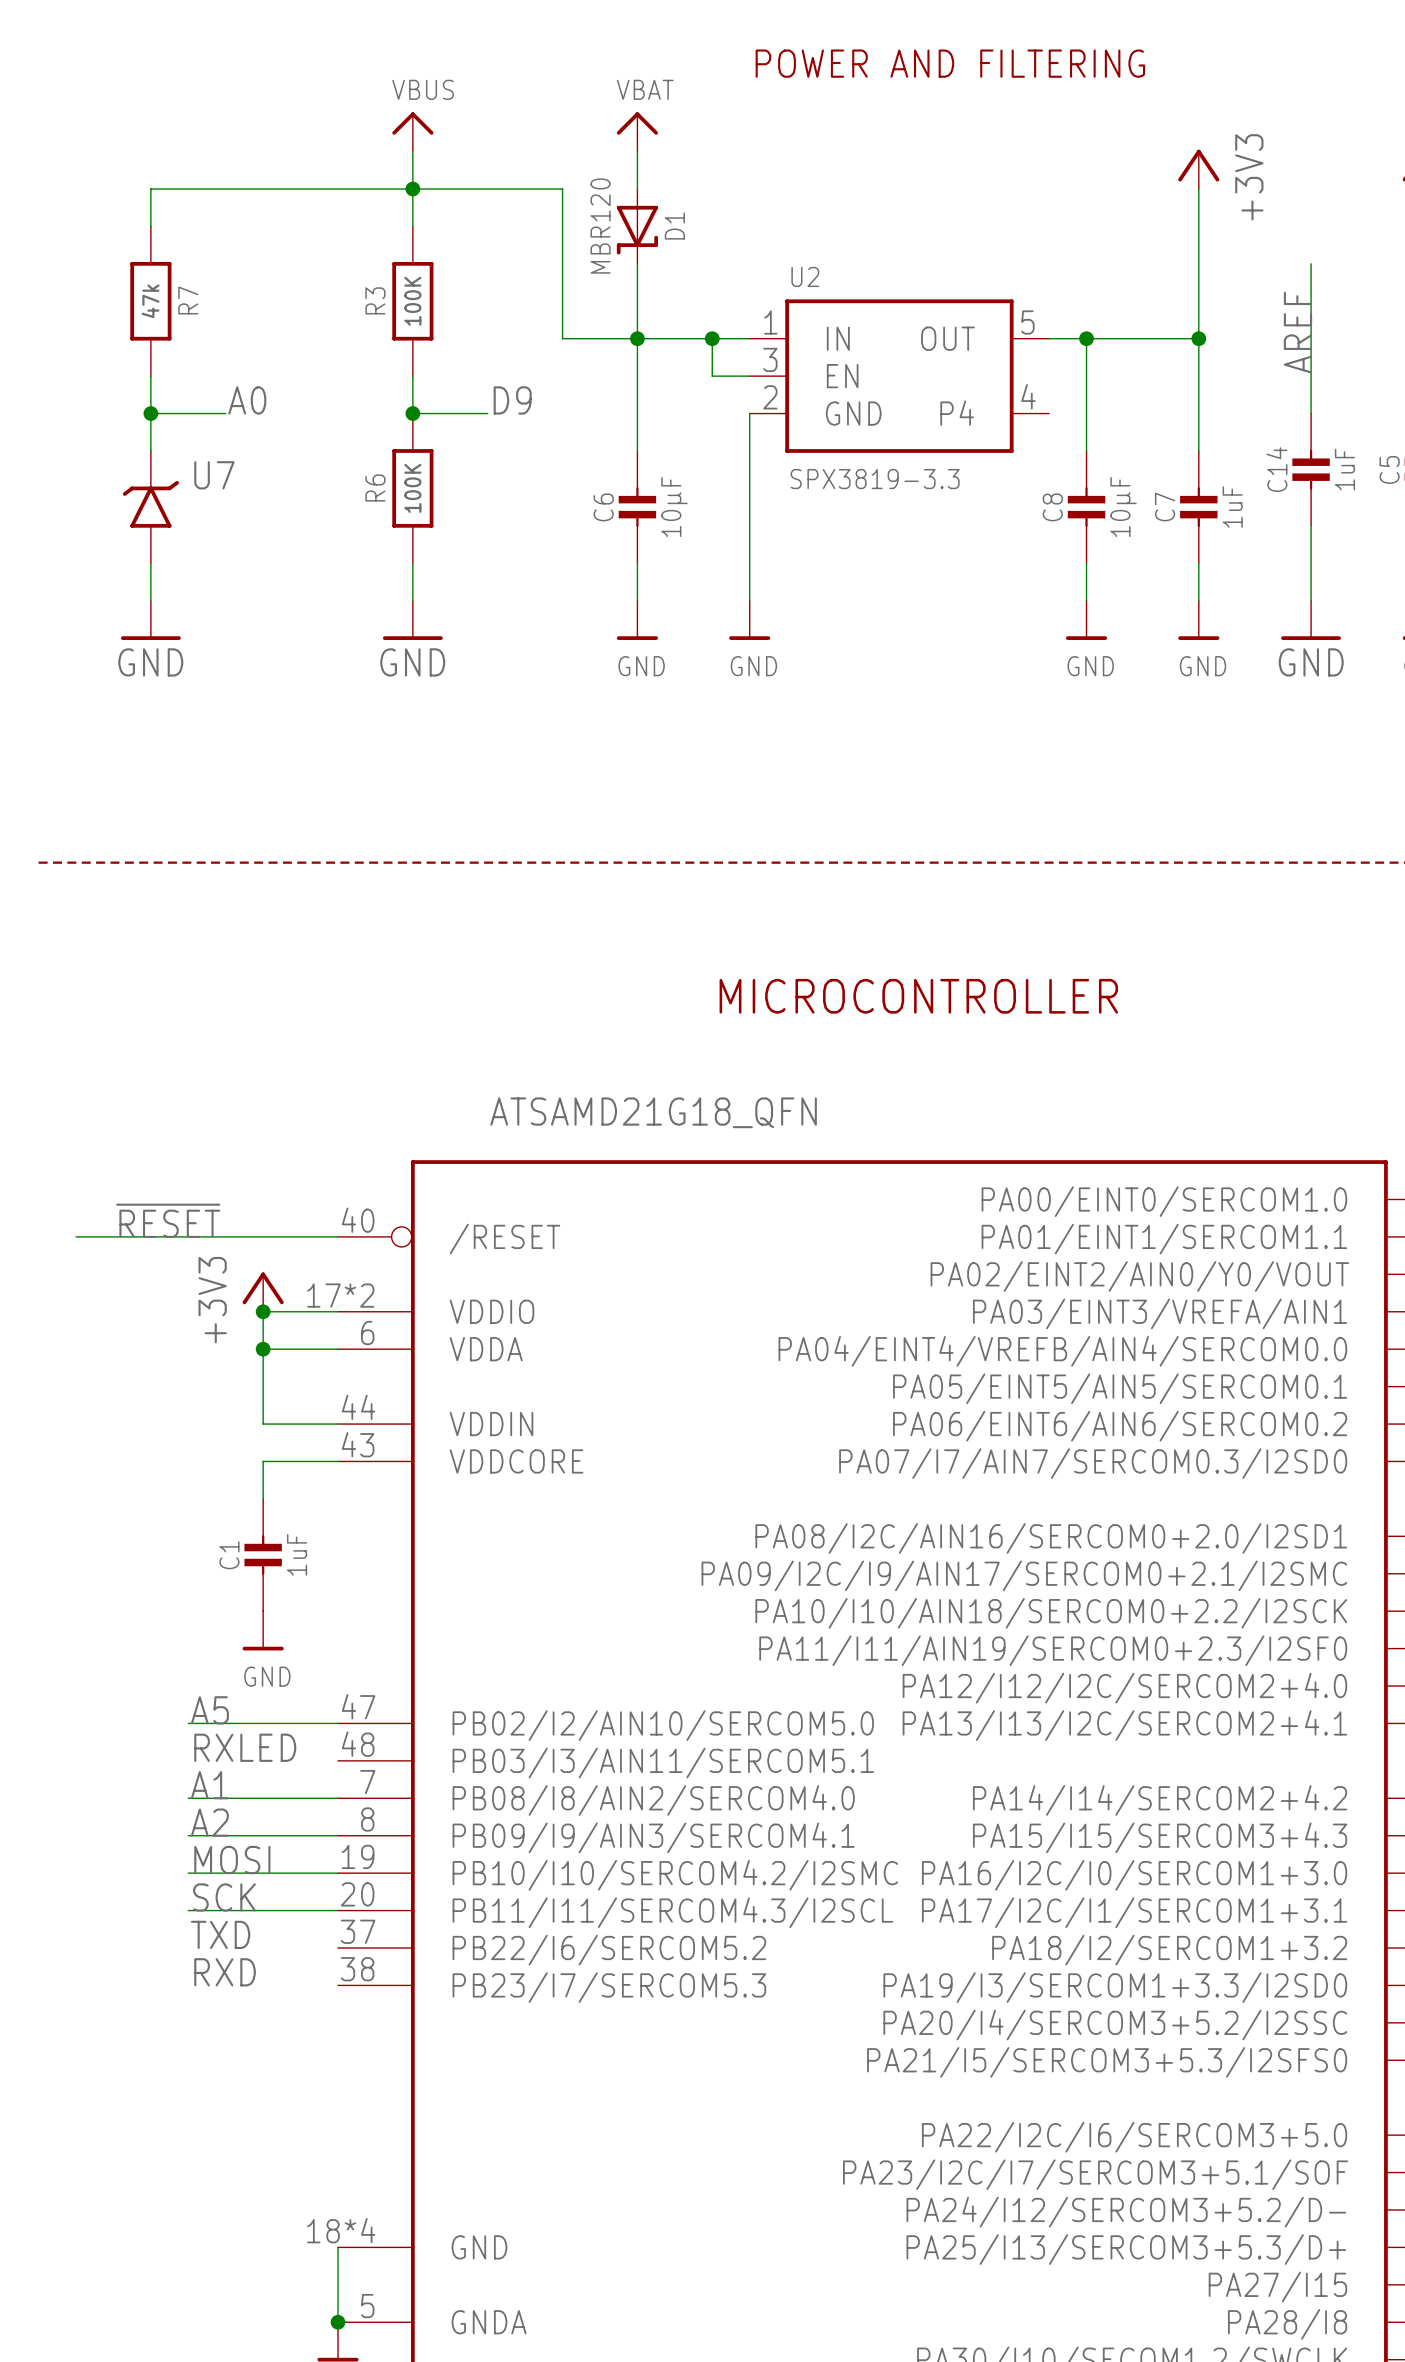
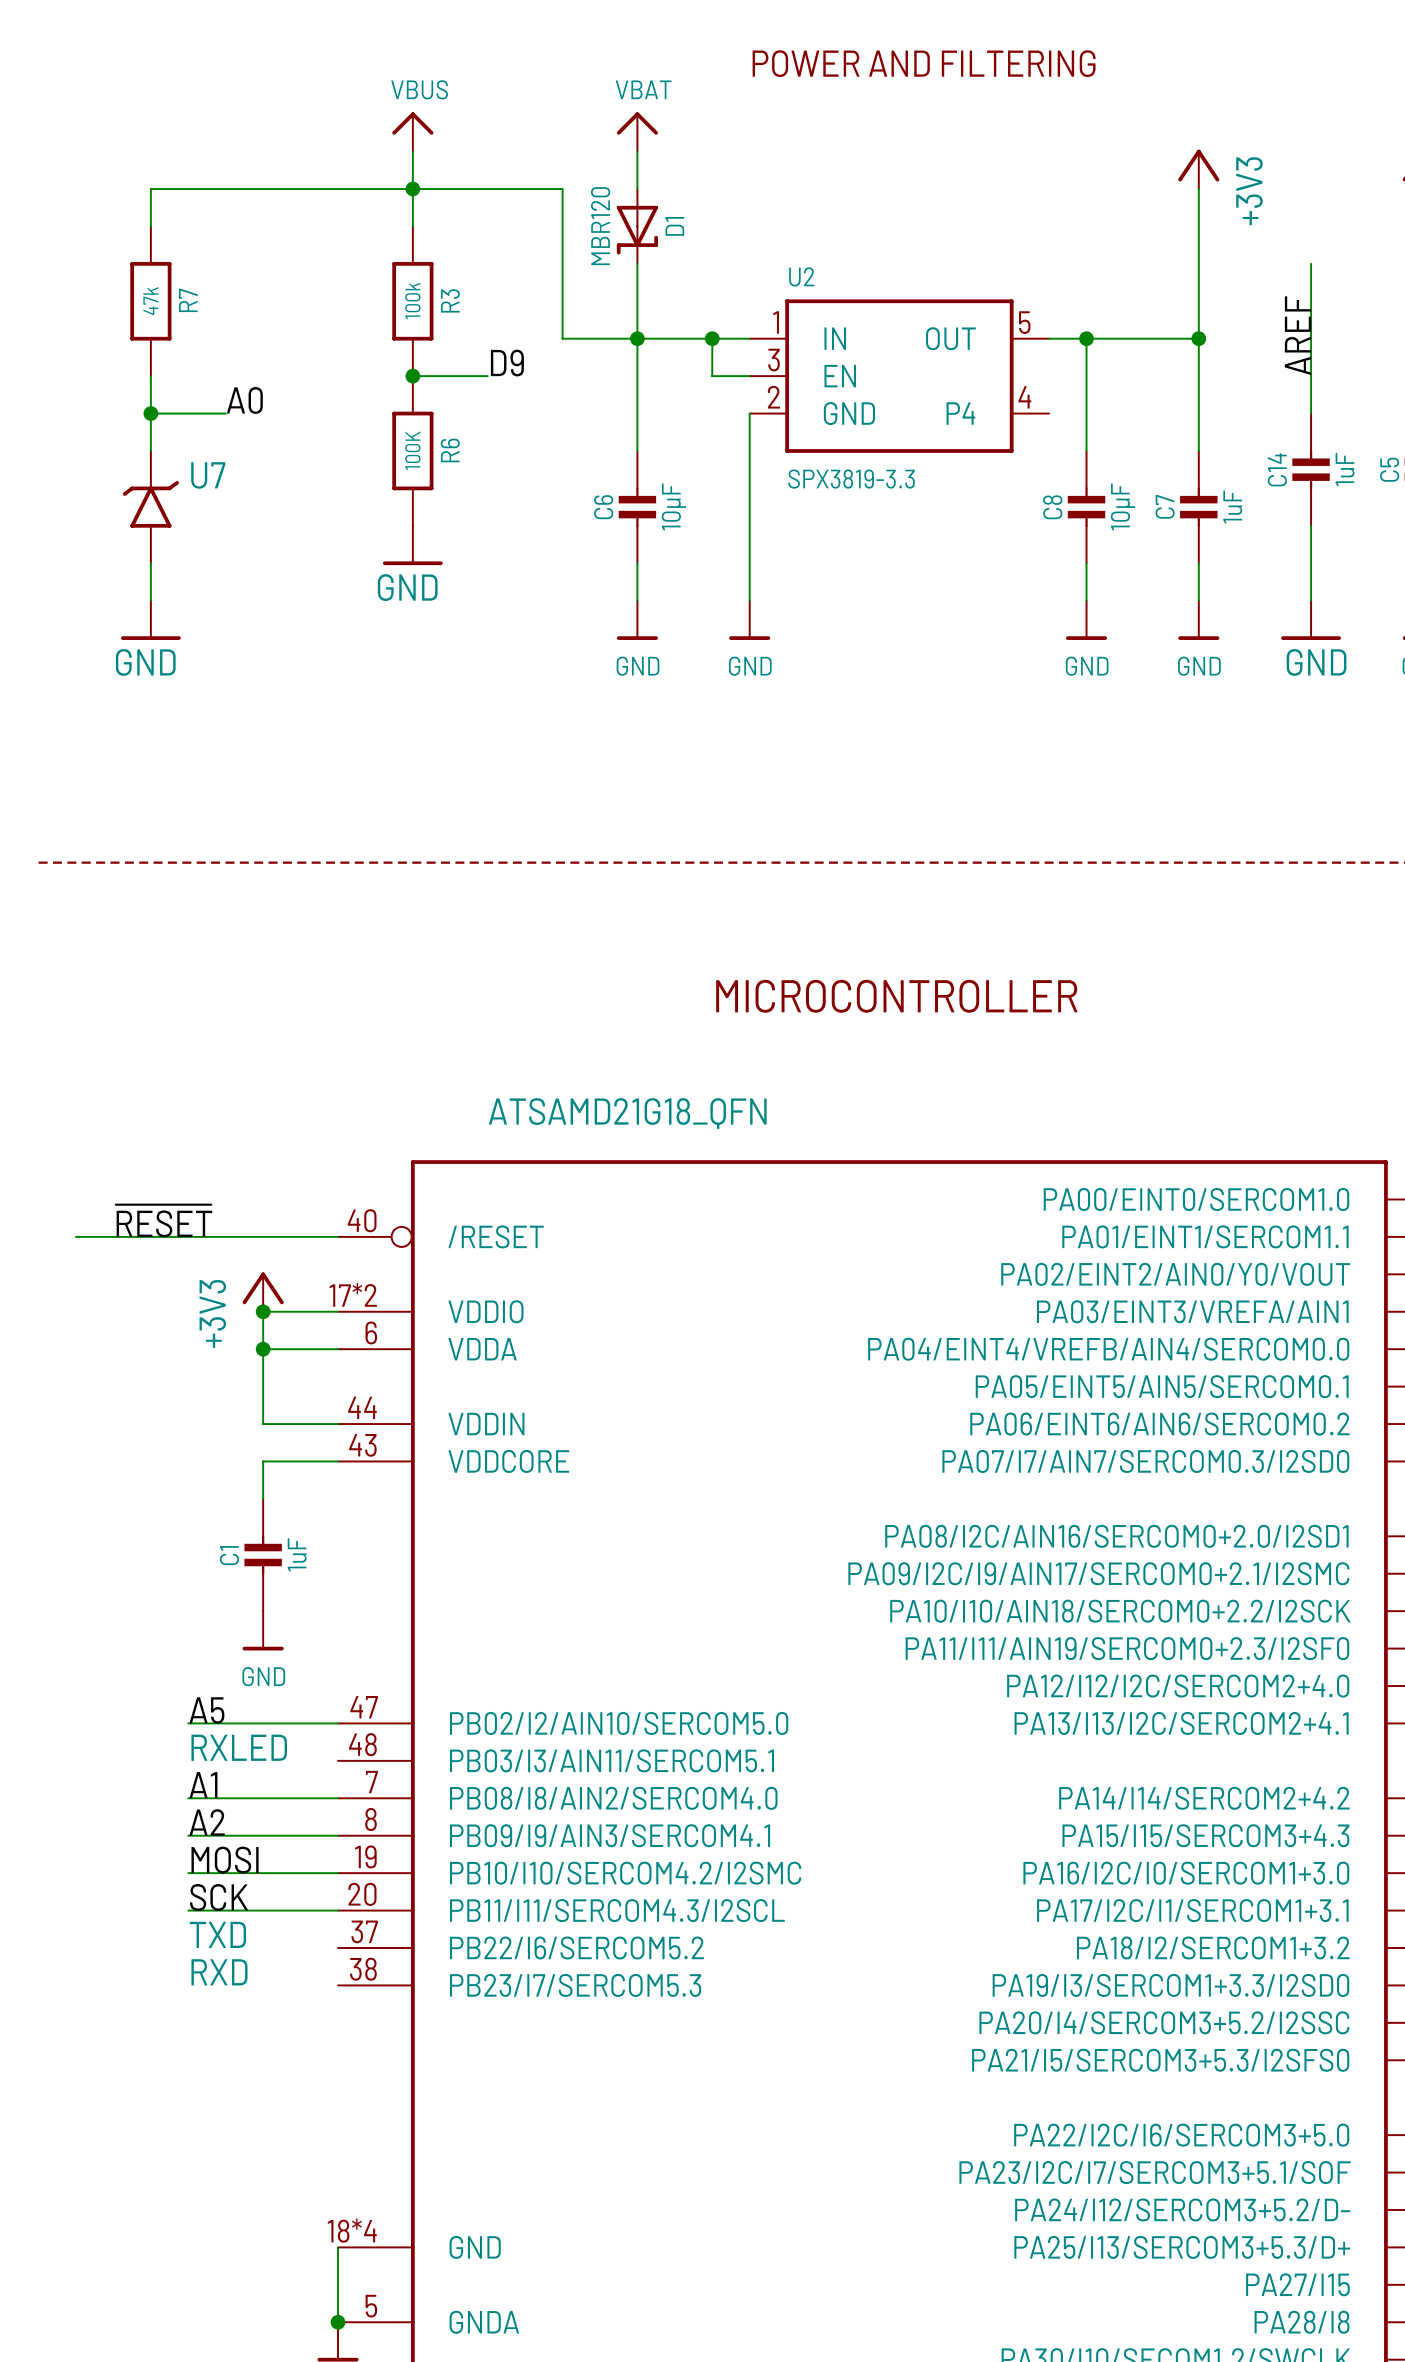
R3 name position: R3 (375, 300) -> R3 (450, 300)
R3 value: 100K (412, 301) -> 100k (412, 301)
wire: (412, 376) (412, 413) (487, 413) -> (412, 376) (487, 376)
label position: D9 (512, 400) -> D9 (507, 363)
junction position: (412, 413) -> (412, 376)
R6 name position: R6 (375, 488) -> R6 (450, 450)
R6 position: (412, 488) -> (412, 450)
wire: (412, 563) (412, 600) -> none
power symbol position: GND (412, 620) -> GND (412, 545)

